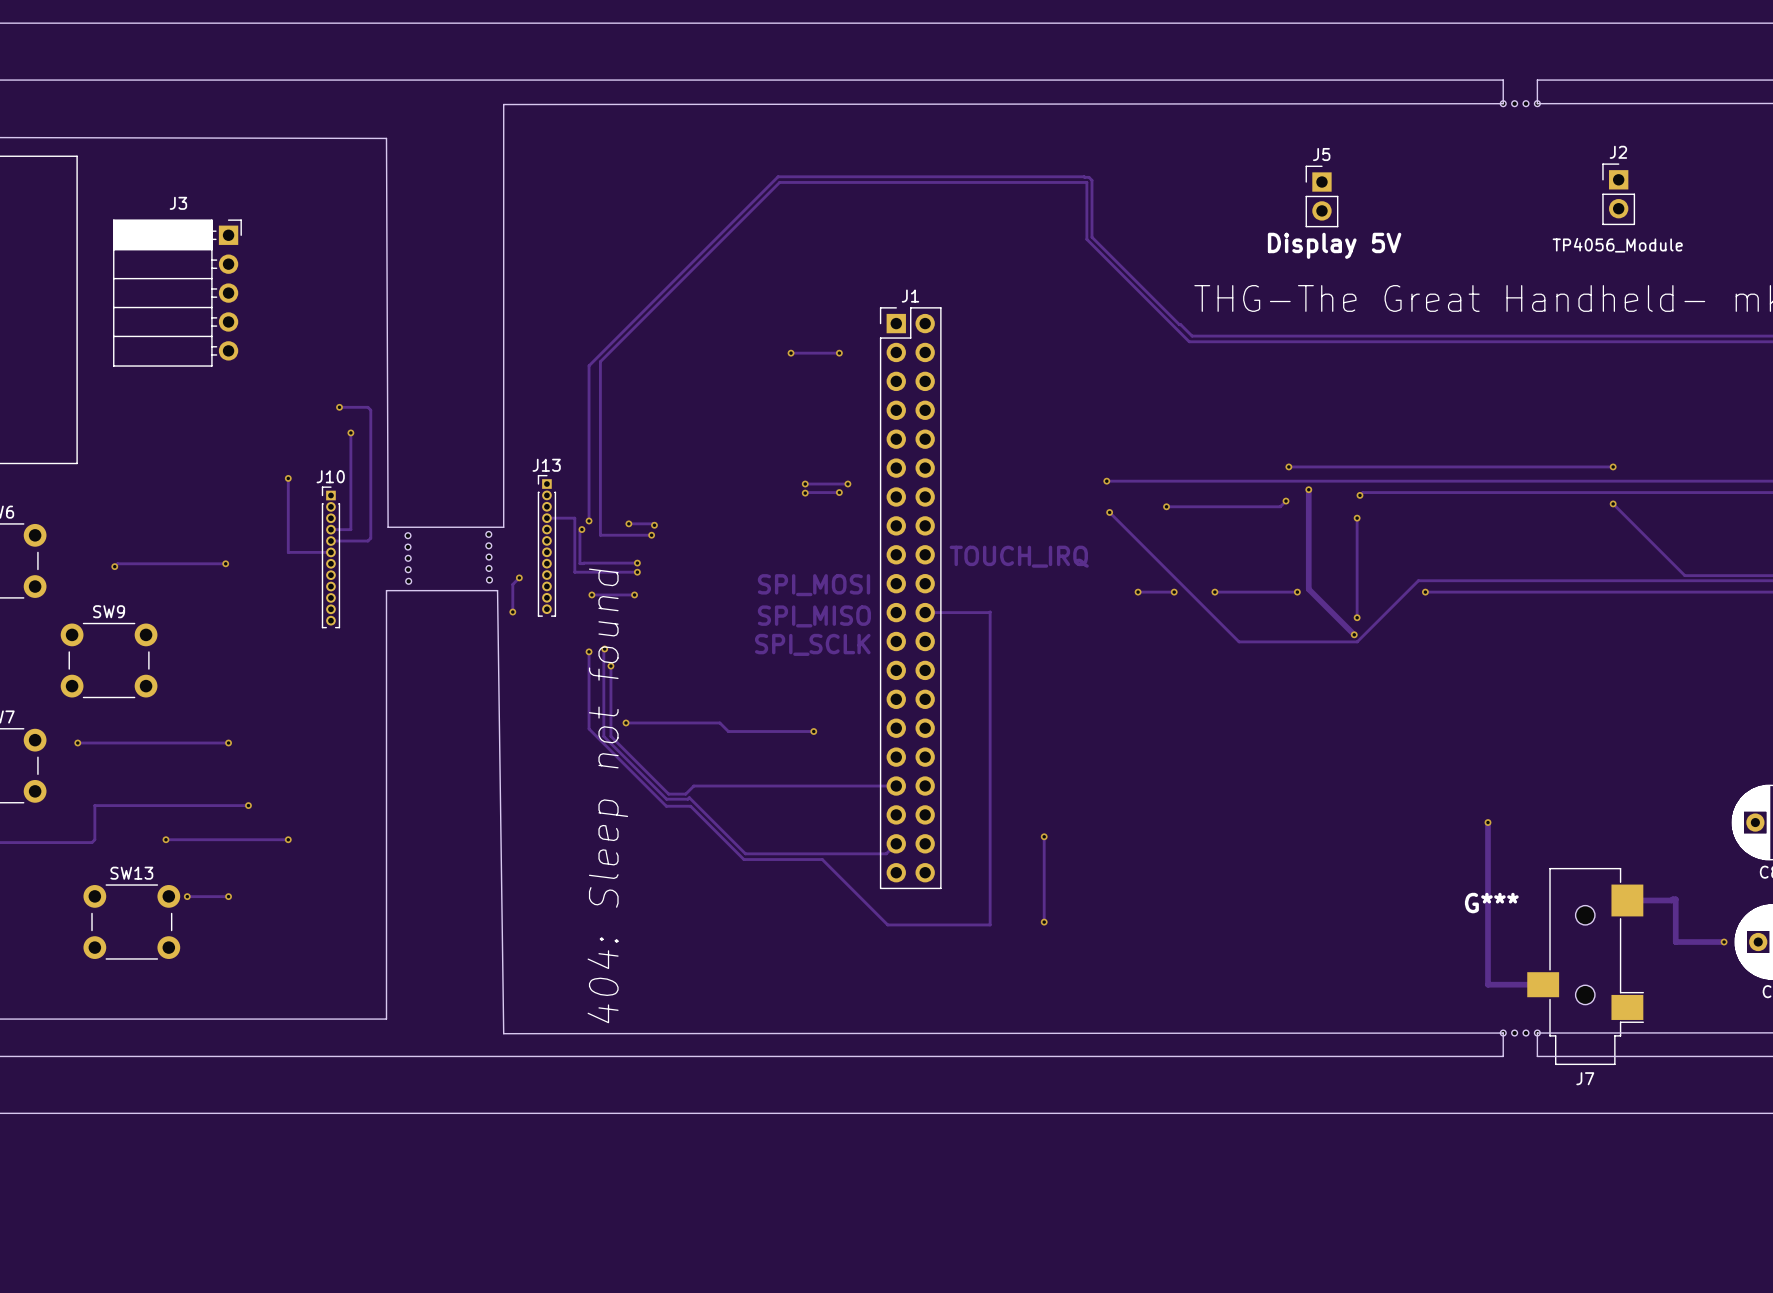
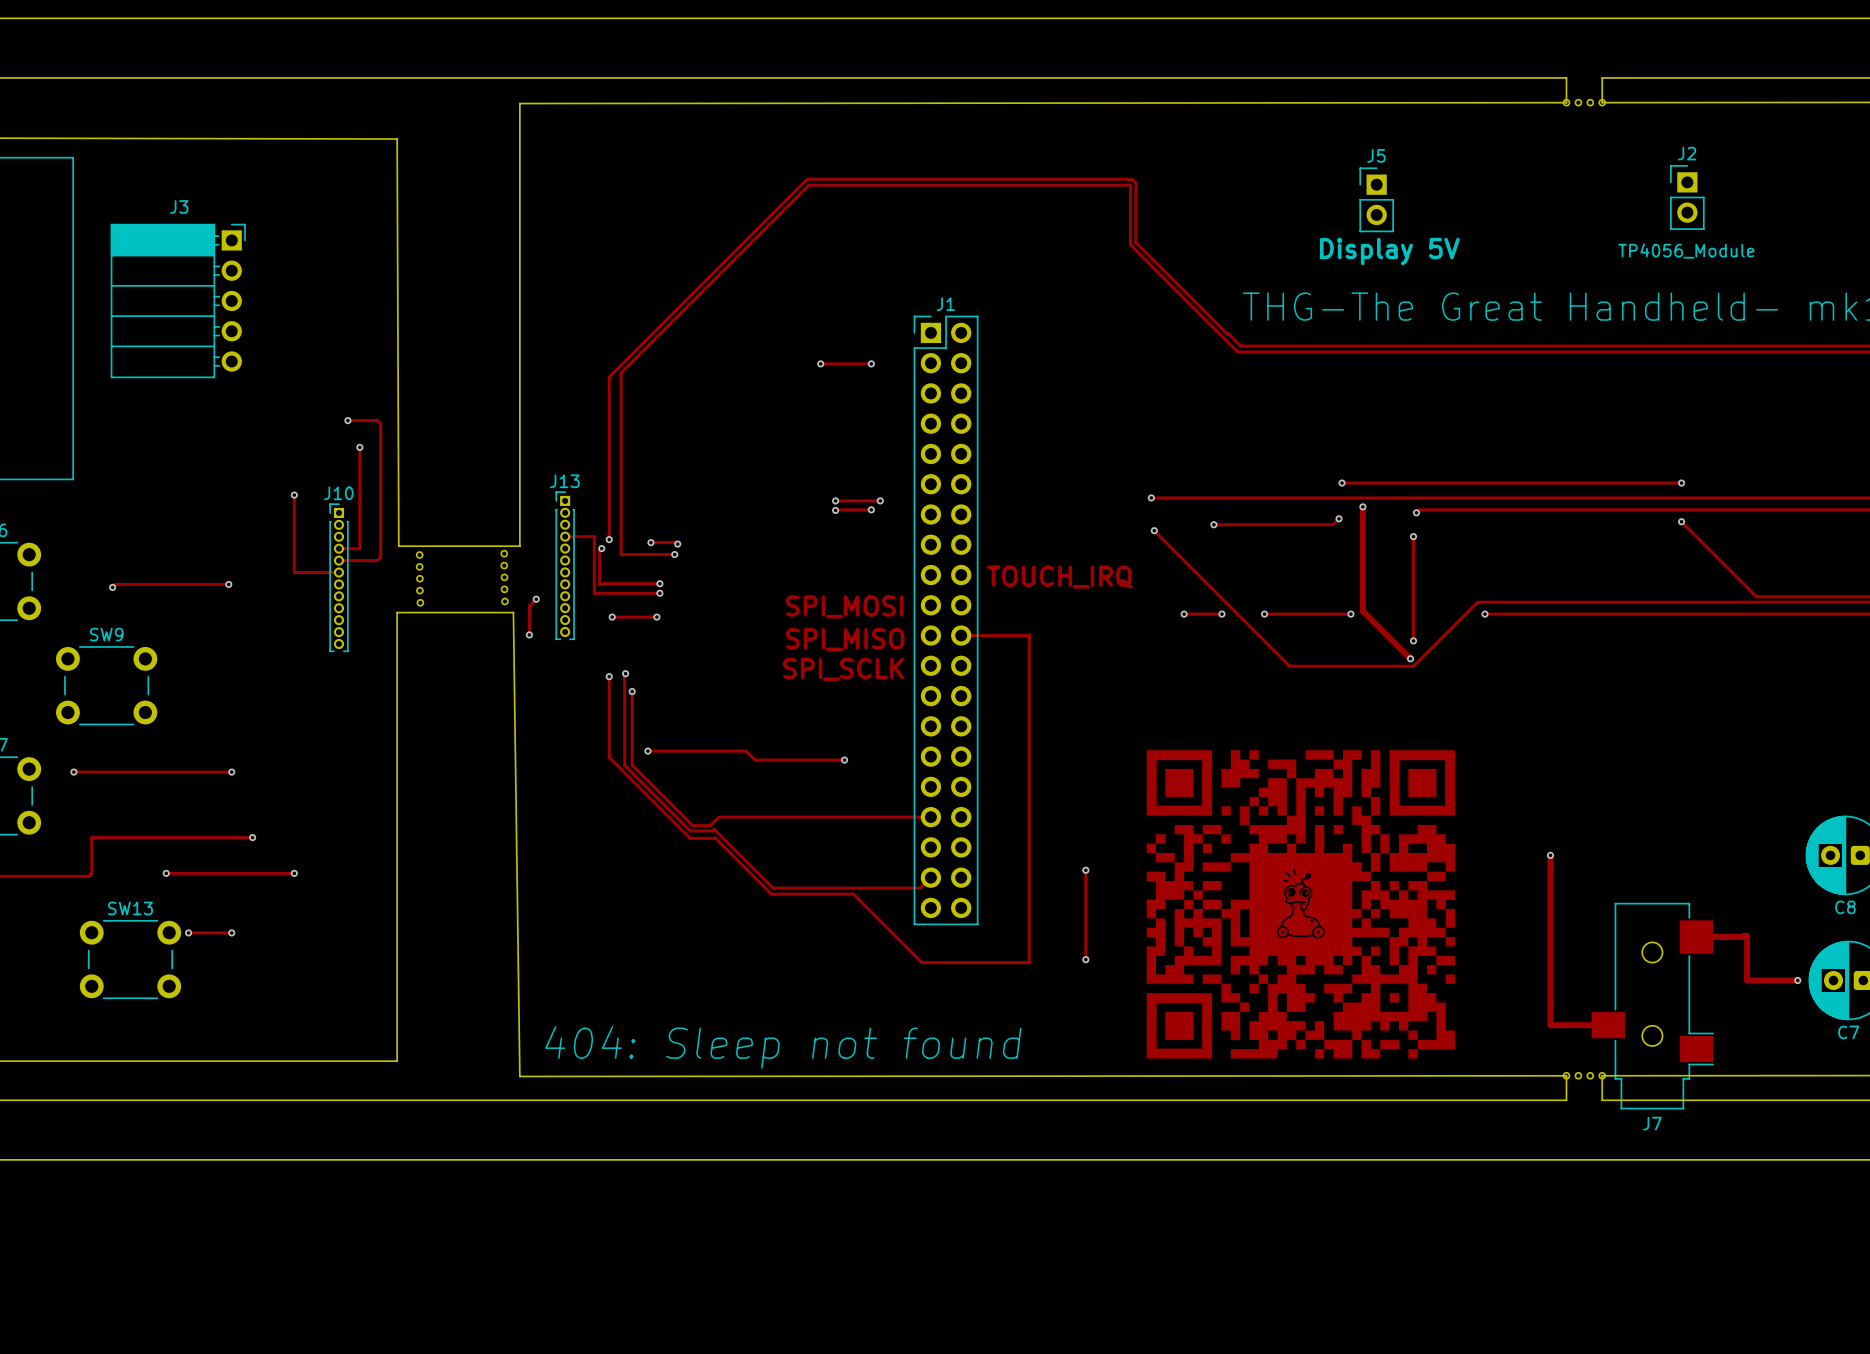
drawing: none -> [1146, 750, 1456, 1059]
text rotation: 0° (607, 795) -> 90° clockwise (783, 1047)
G***: (1491, 903) -> none

